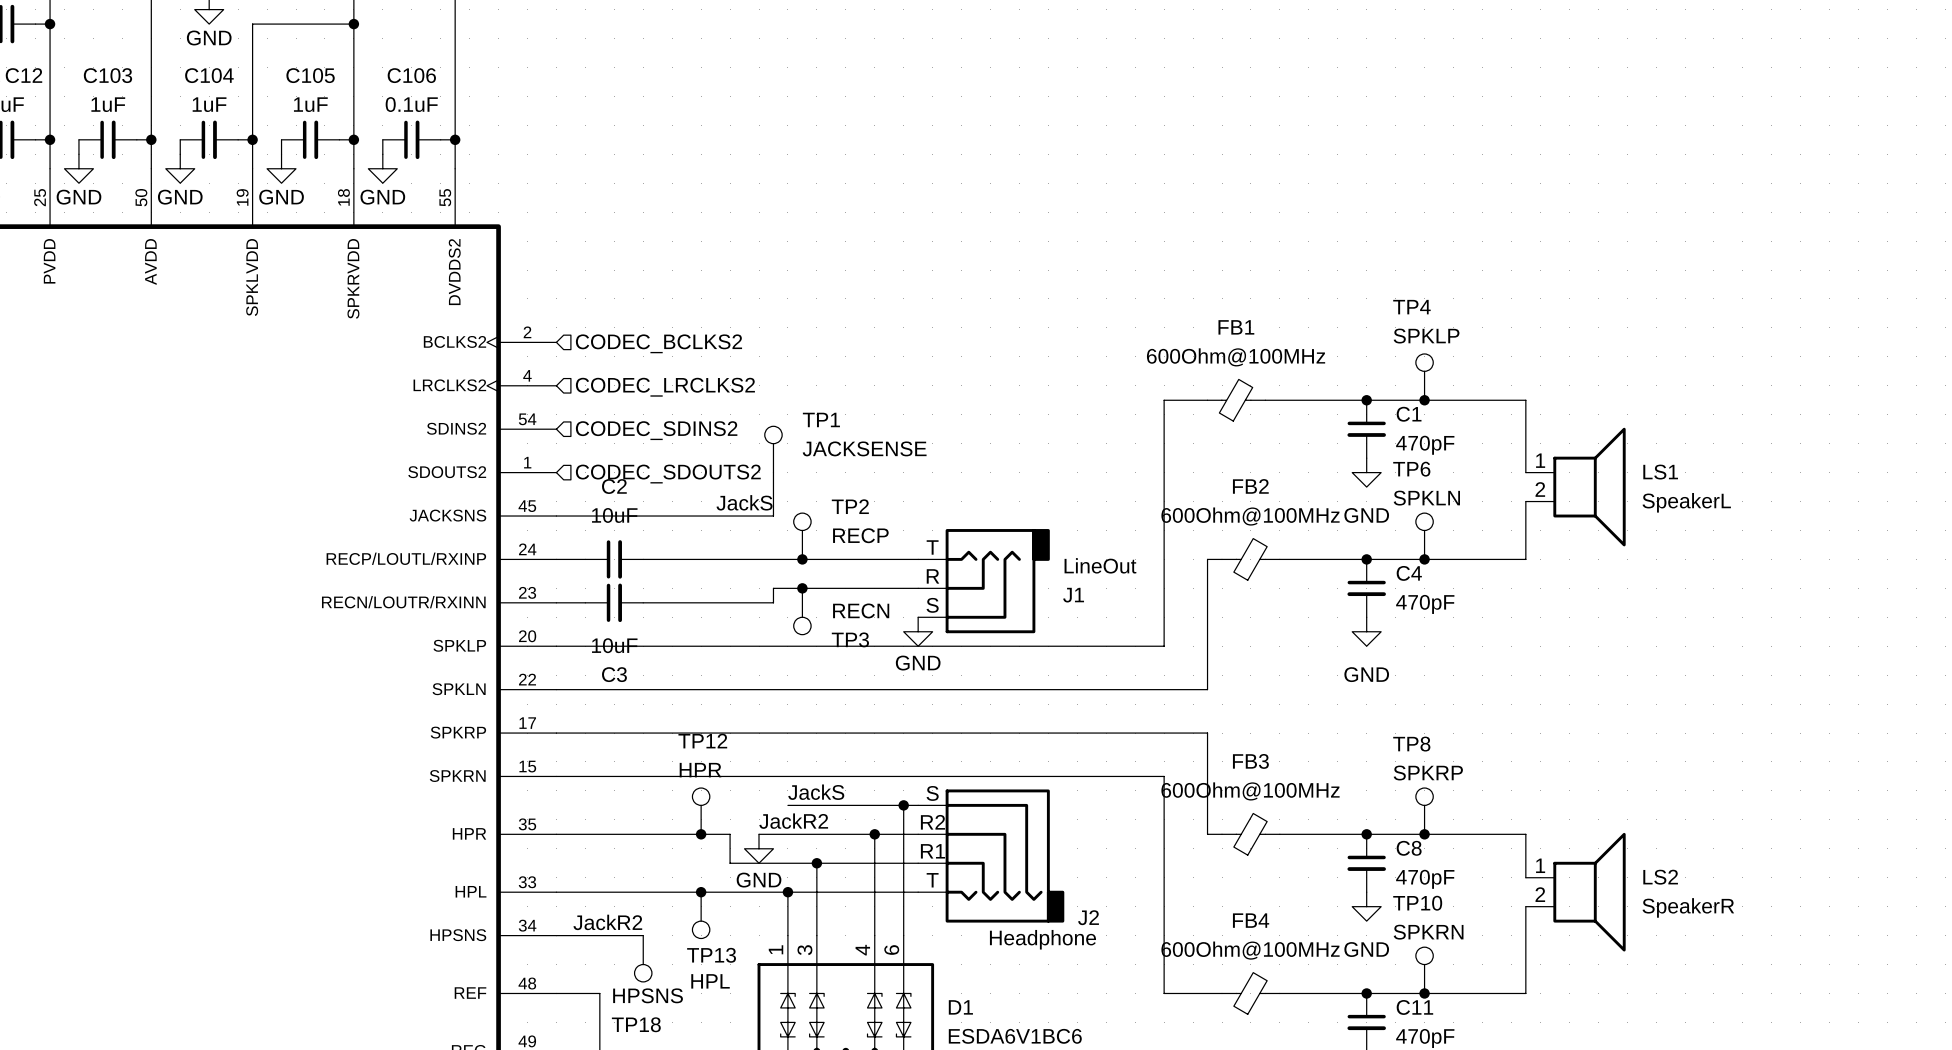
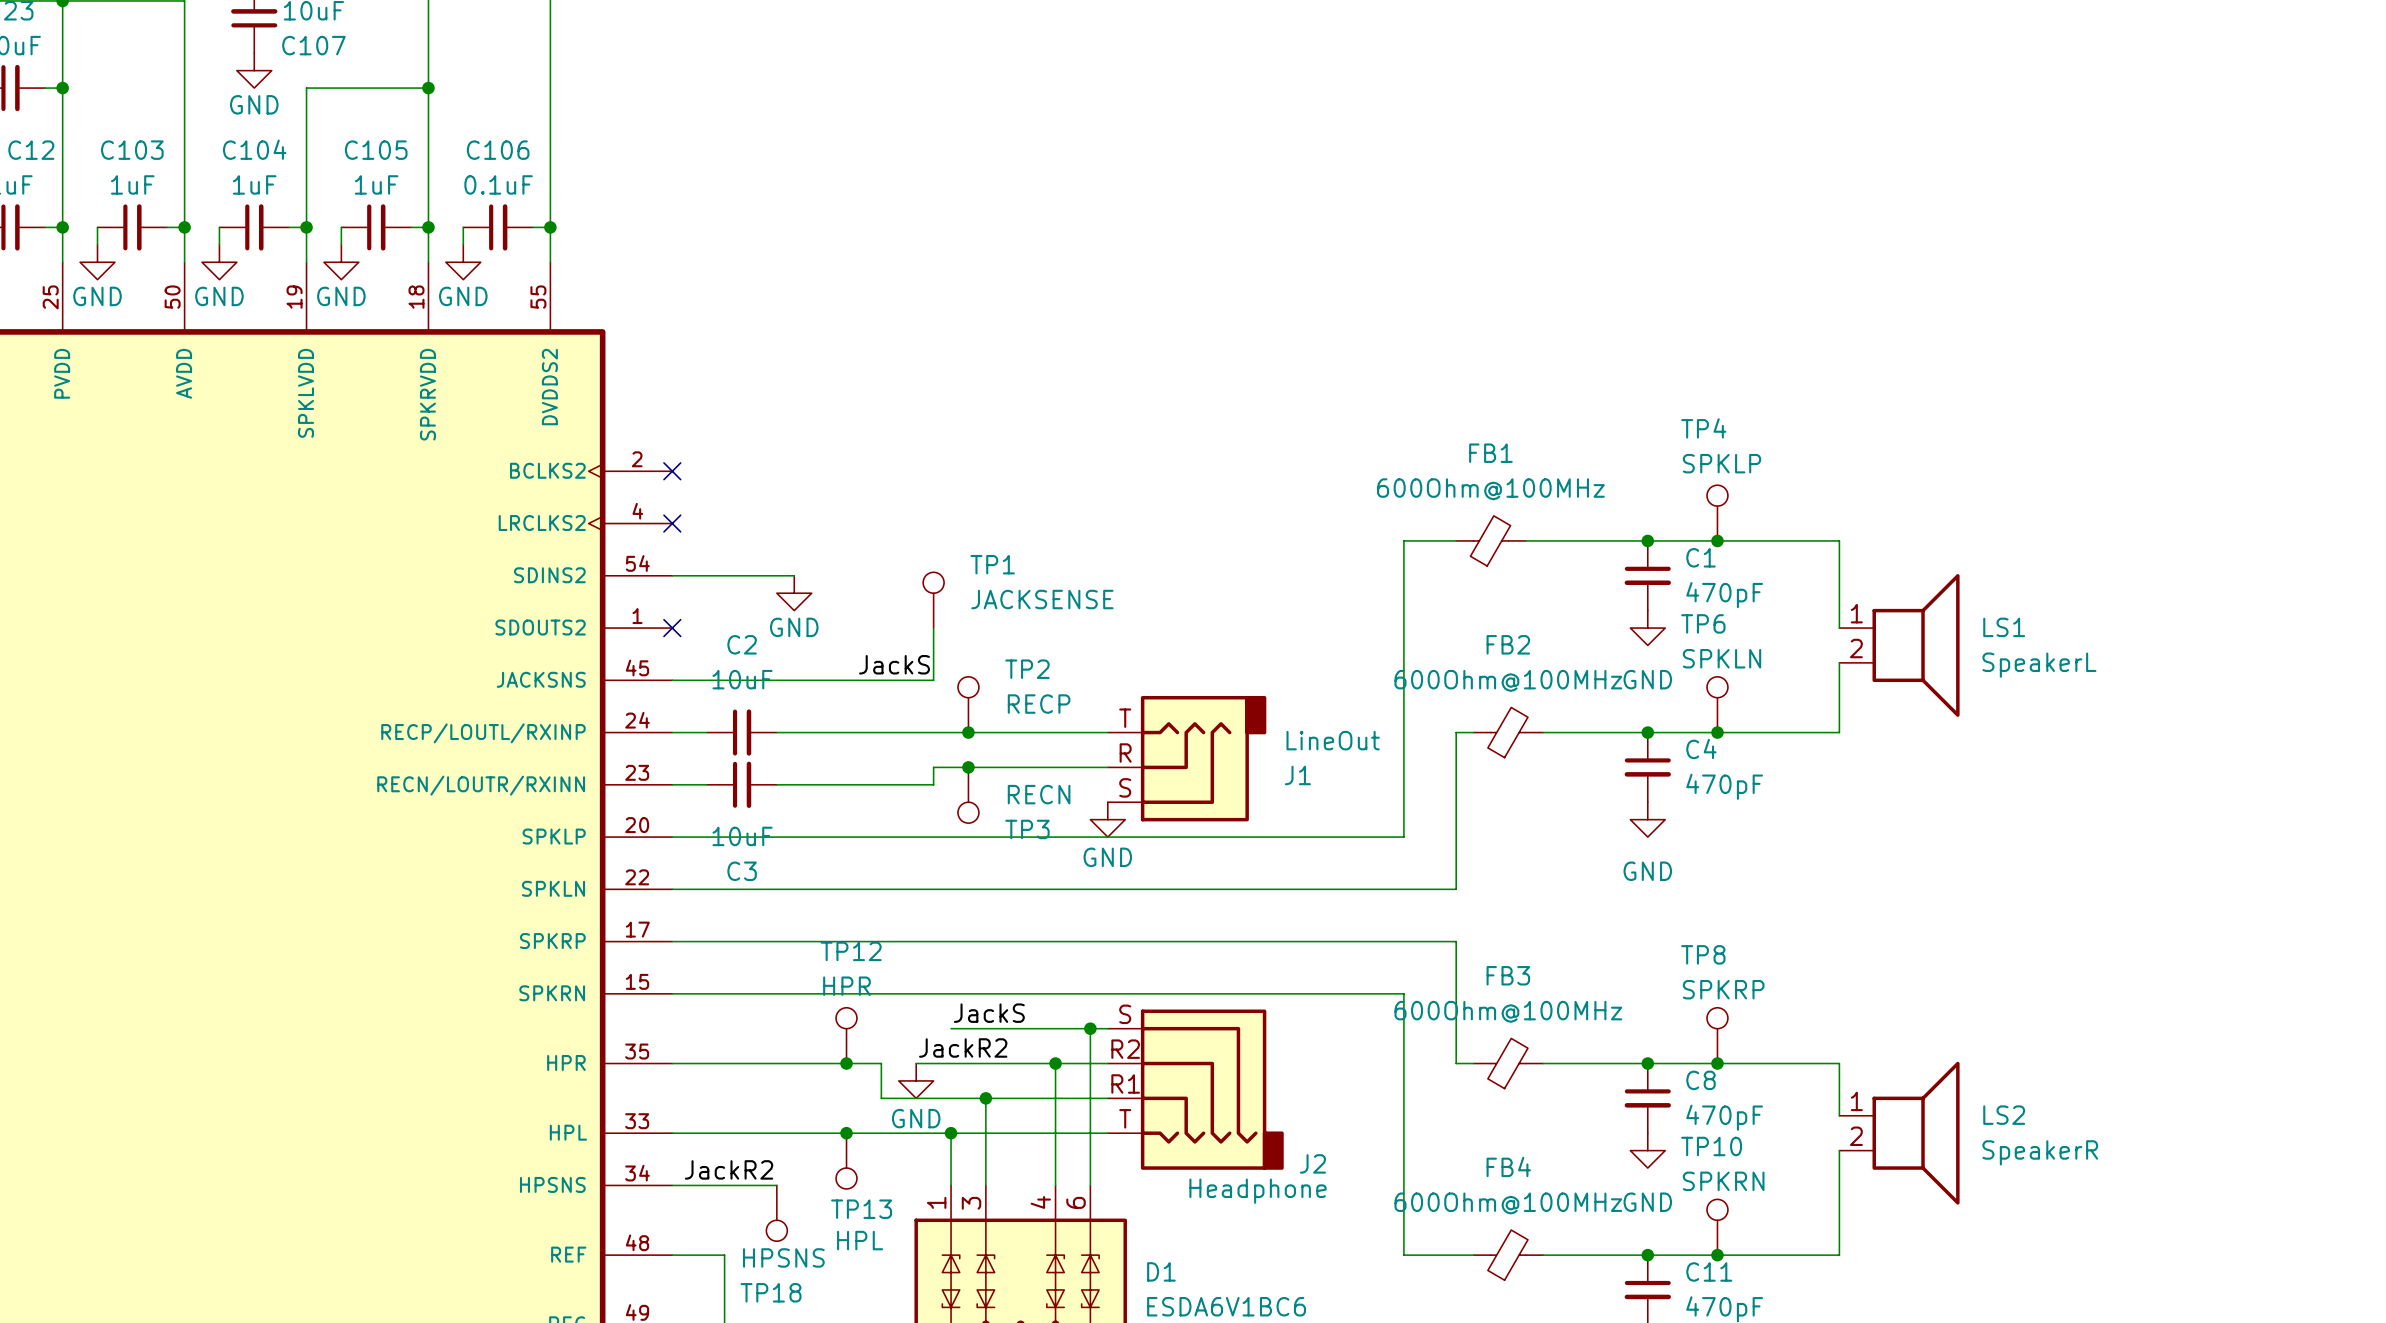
no-connect mark: none -> (672, 471)
hierarchical label: CODEC_BCLKS2 (658, 343) -> none
no-connect mark: none -> (672, 523)
hierarchical label: CODEC_LRCLKS2 (665, 387) -> none
wire: none -> (672, 575) (794, 575)
hierarchical label: CODEC_SDINS2 (656, 430) -> none
power symbol: none -> GND (794, 593)
no-connect mark: none -> (672, 628)
hierarchical label: CODEC_SDOUTS2 (668, 474) -> none

